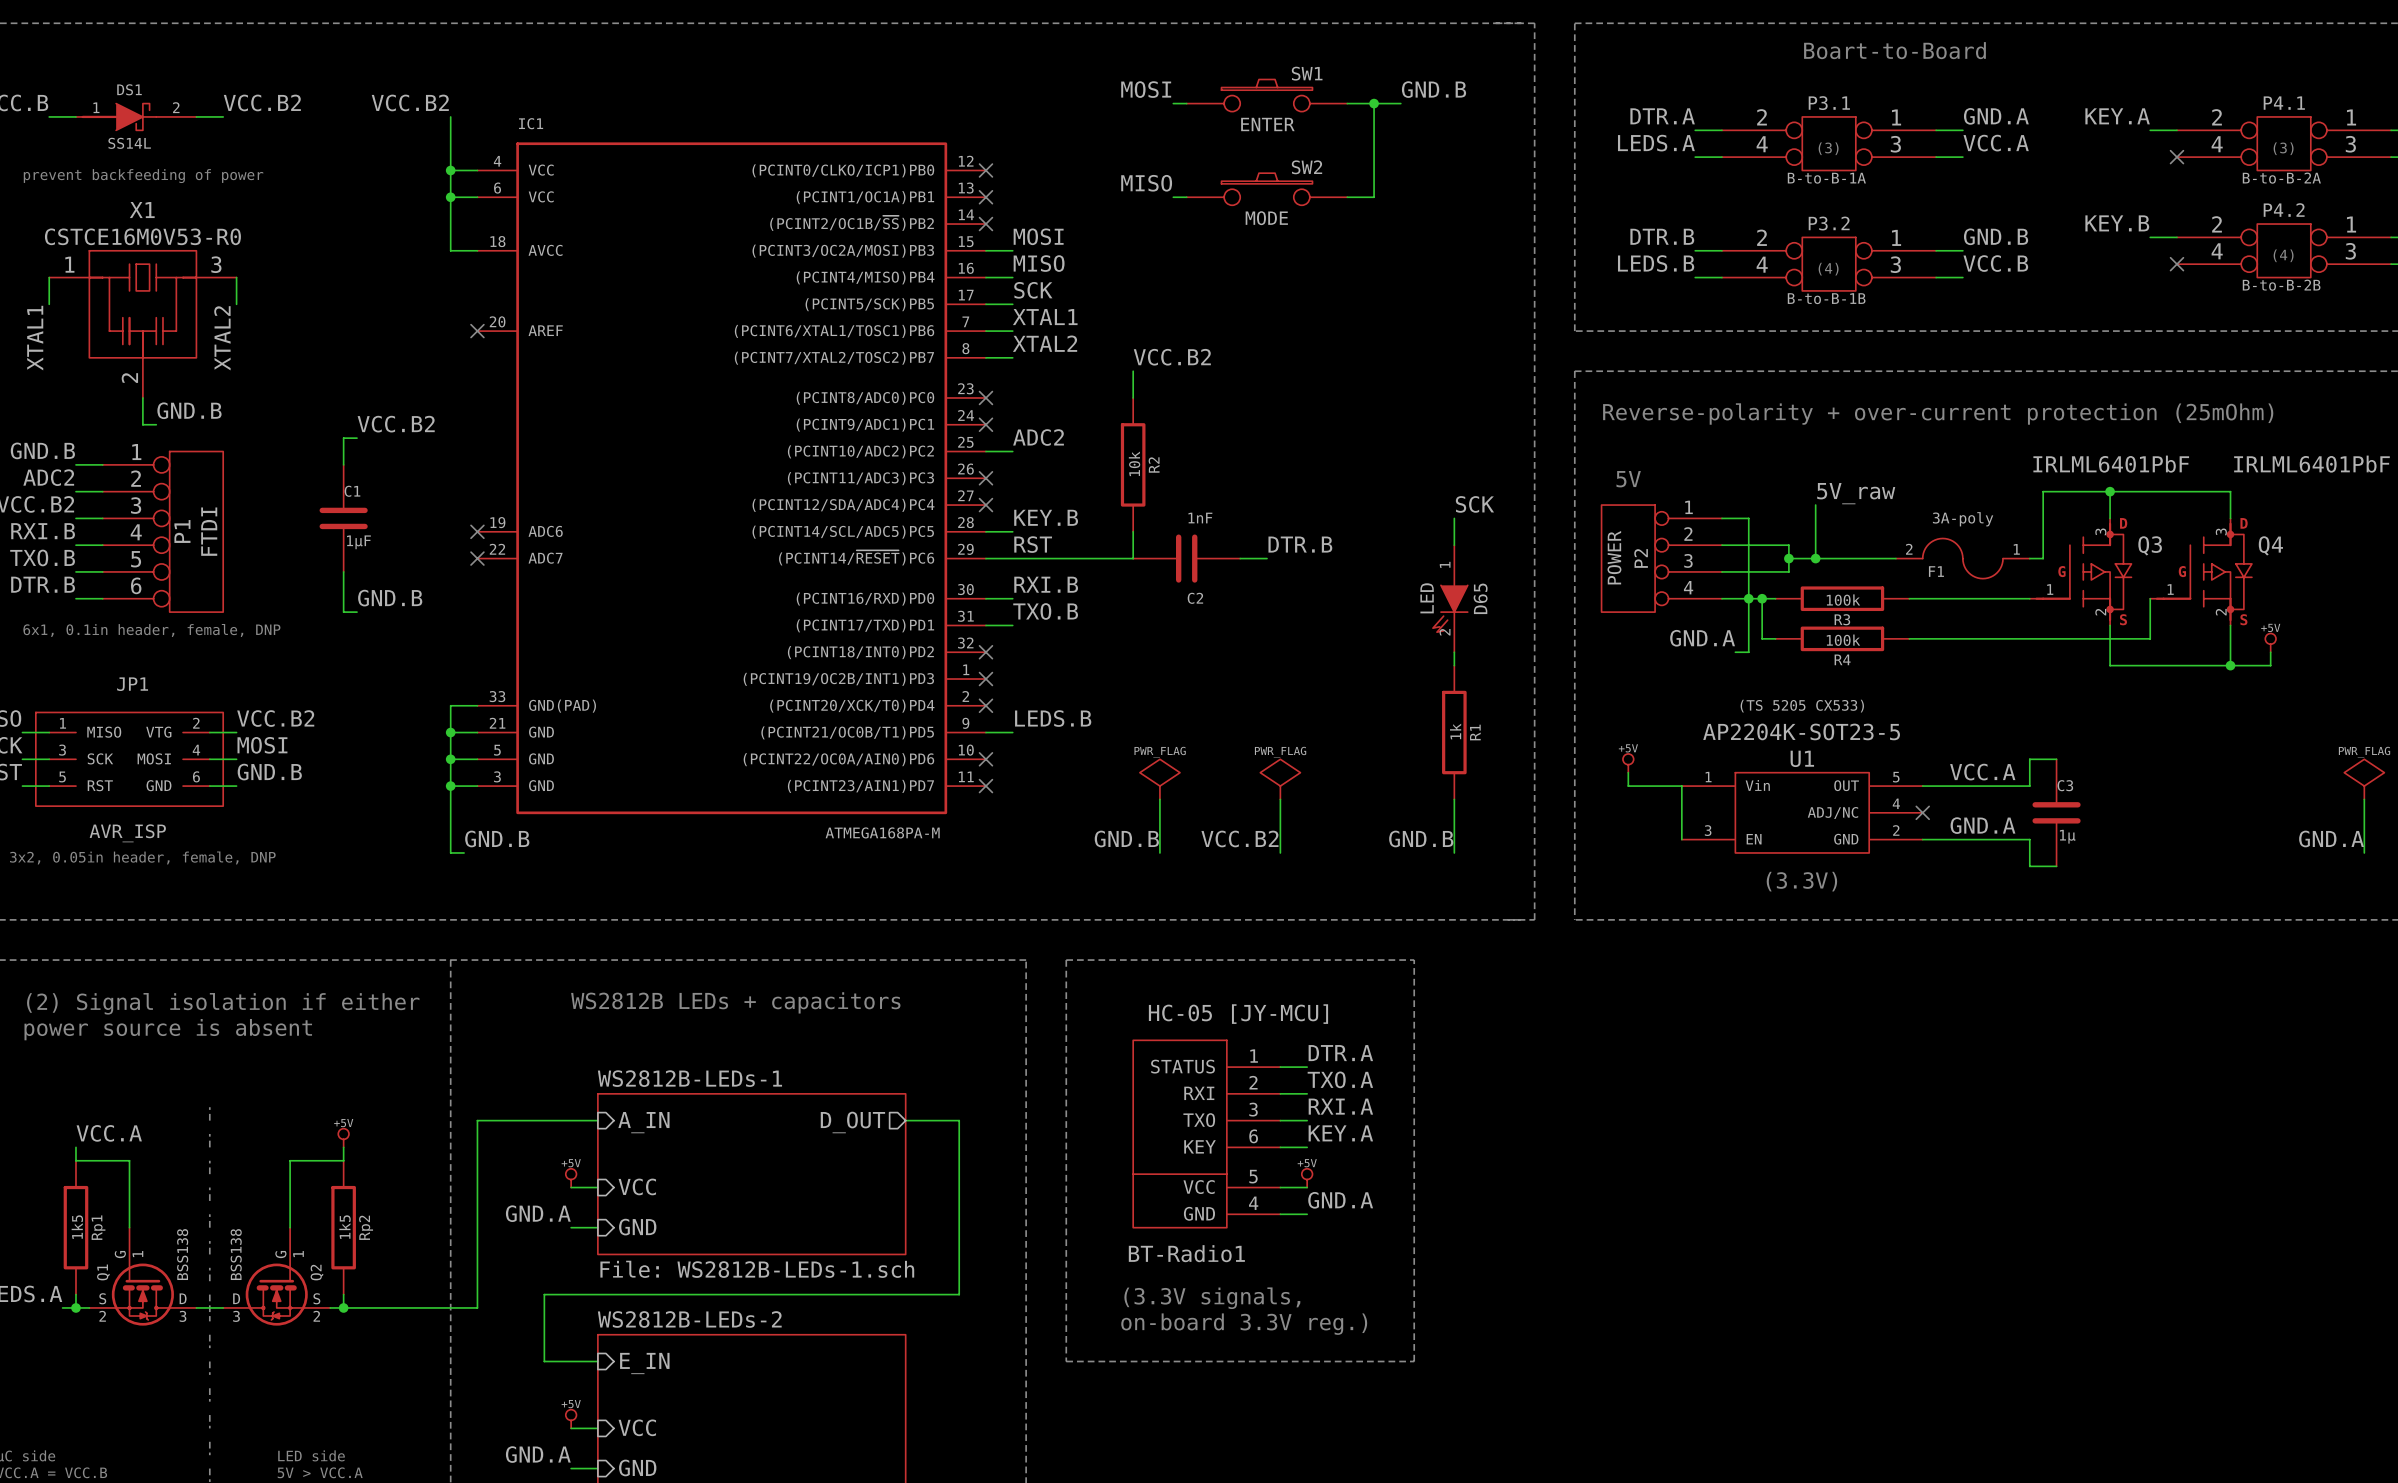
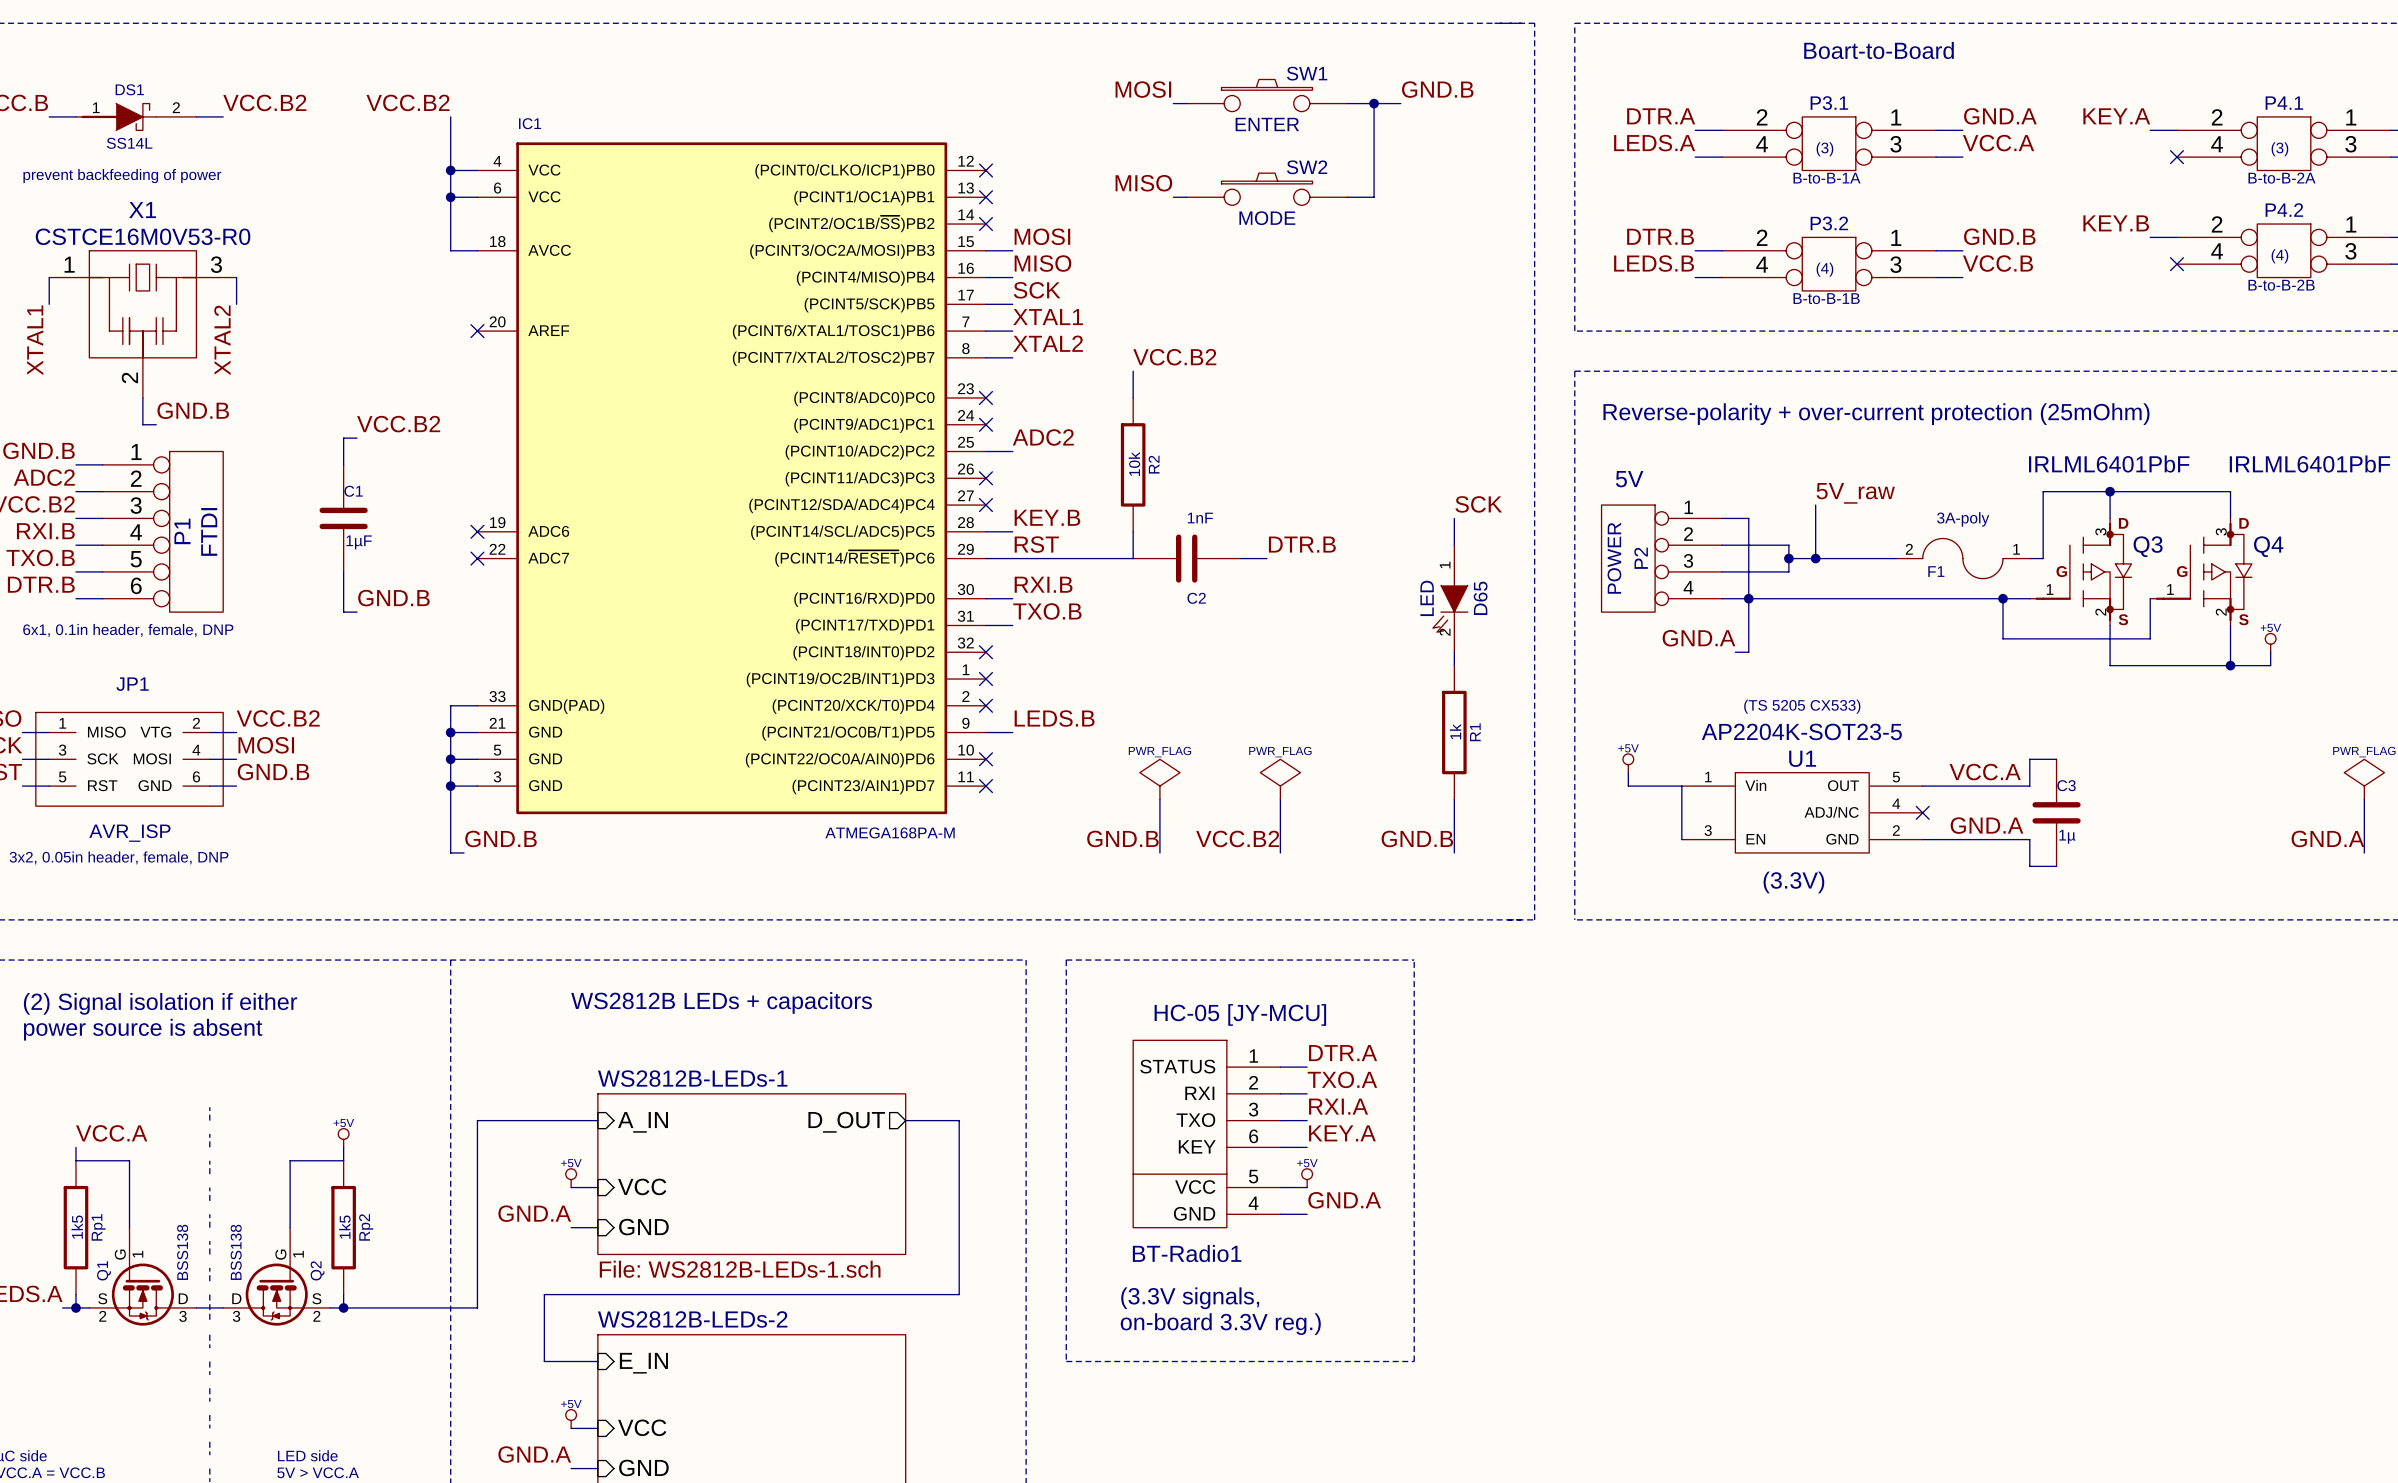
wire: (1762, 598) (1762, 638) (1775, 638) -> none
junction: (1762, 598) -> none
wire: none -> (1775, 598) (1909, 598)
R3: 100k (1842, 598) -> none
junction: none -> (2003, 598)
R4: 100k (1842, 638) -> none
wire: (1909, 638) (2003, 638) -> (2003, 598) (2003, 638)

